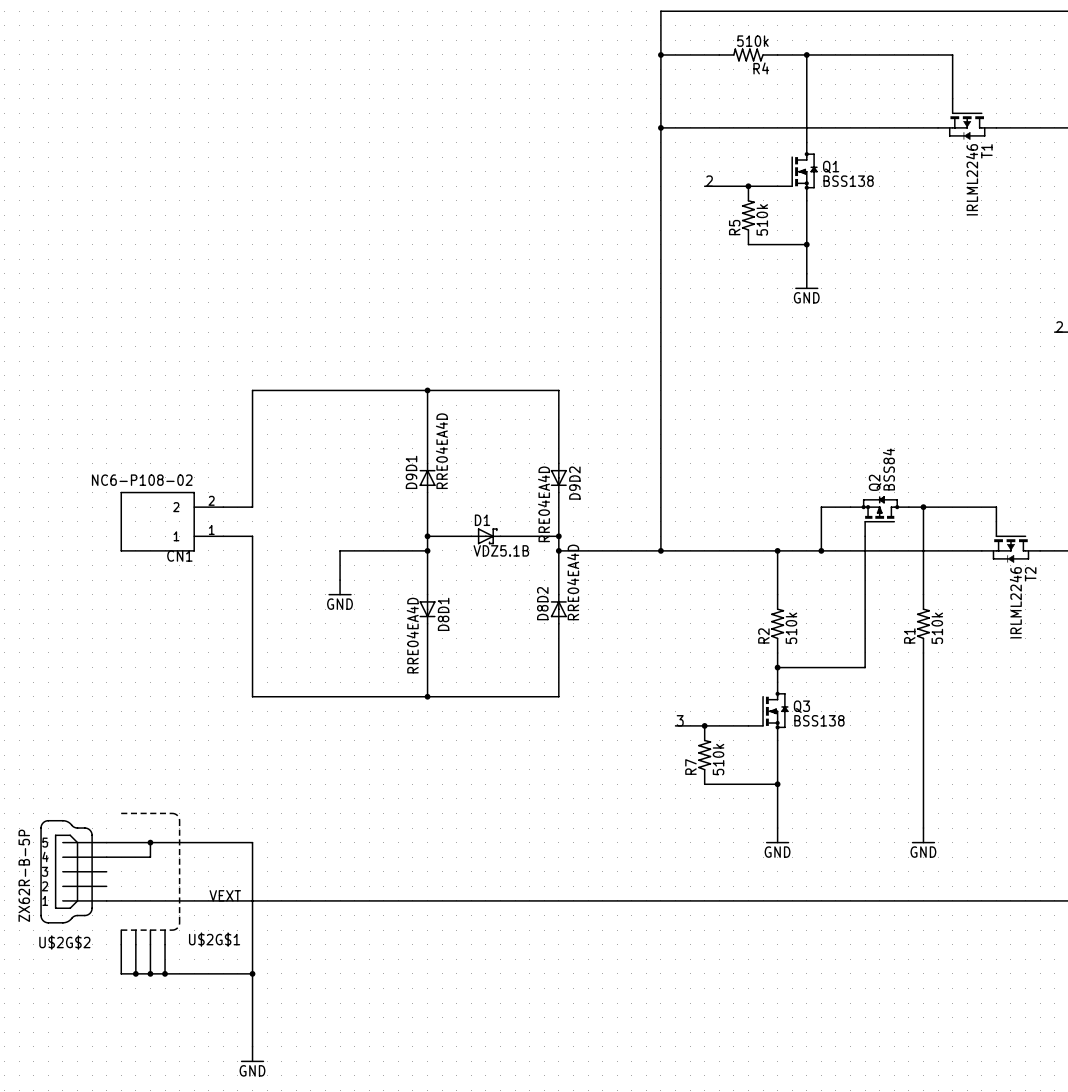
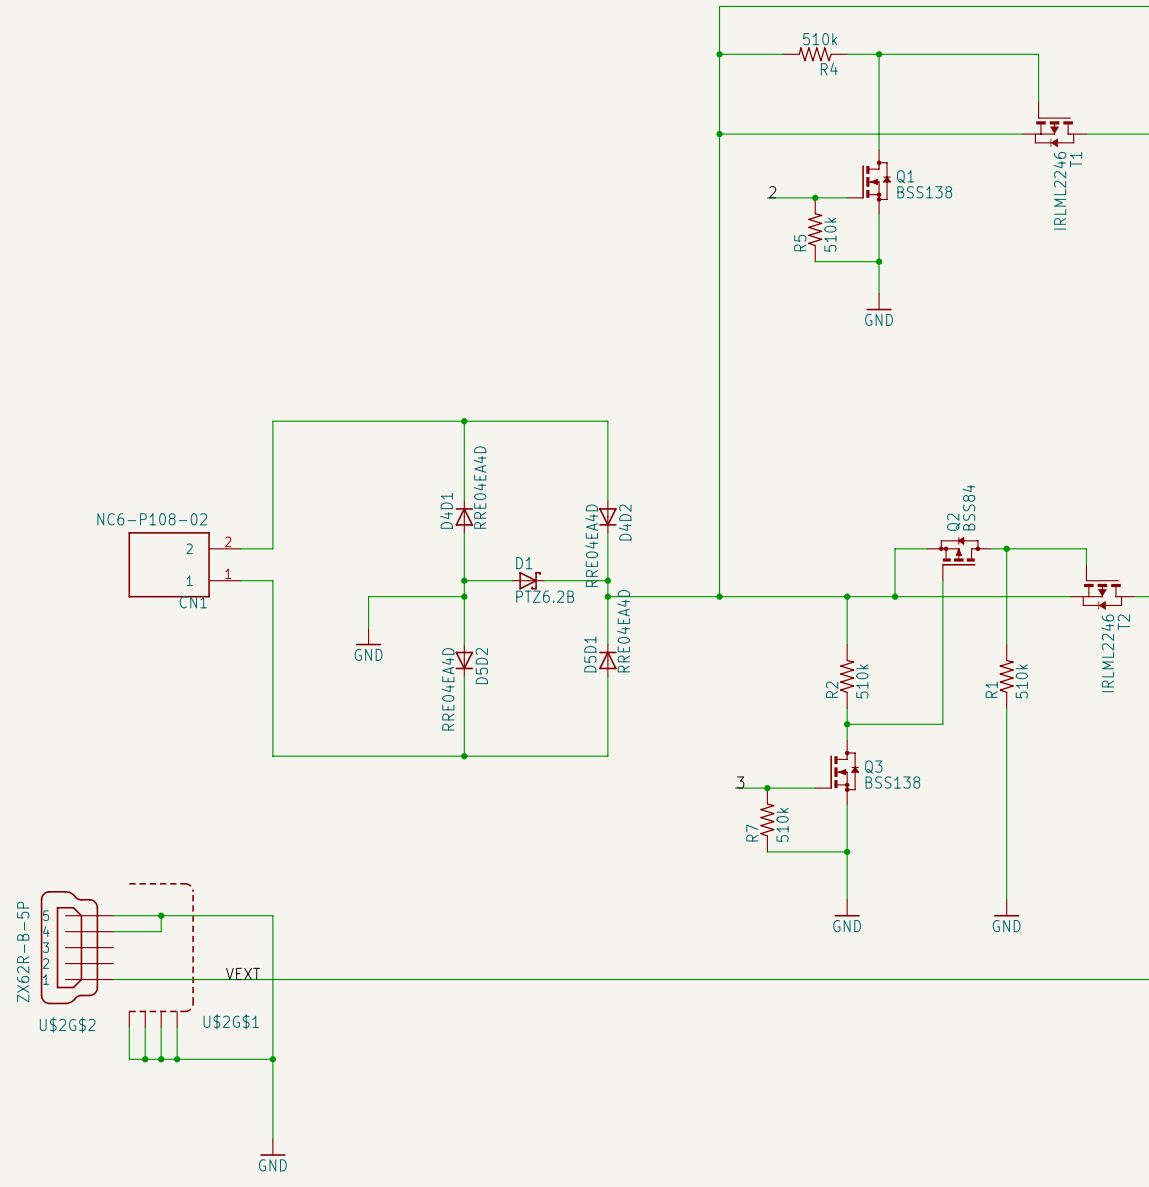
D9D1 name: D9D1 (411, 472) -> D4D1 (446, 510)
D9D2 name: D9D2 (574, 483) -> D4D2 (625, 522)
D1 value: VDZ5.1B (501, 550) -> PTZ6.2B (545, 596)
D8D2 name: D8D2 (542, 603) -> D5D1 (590, 654)
D8D1 name: D8D1 (443, 614) -> D5D2 (481, 666)

